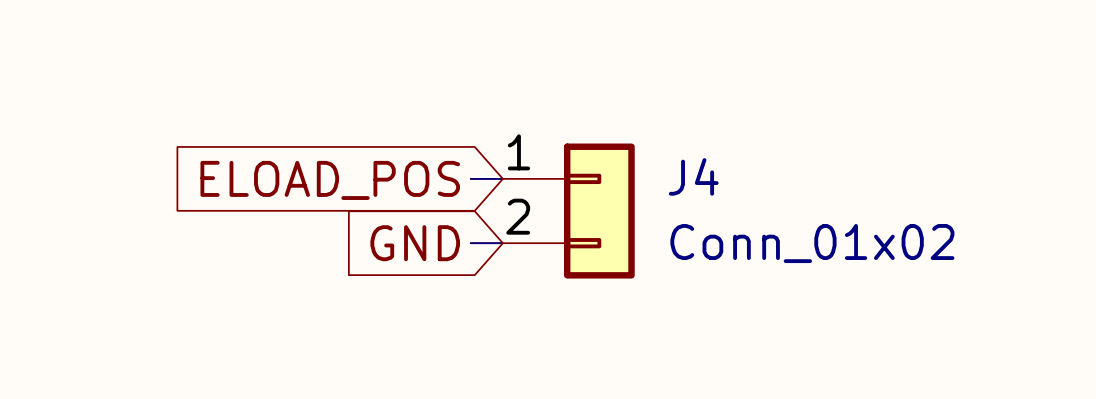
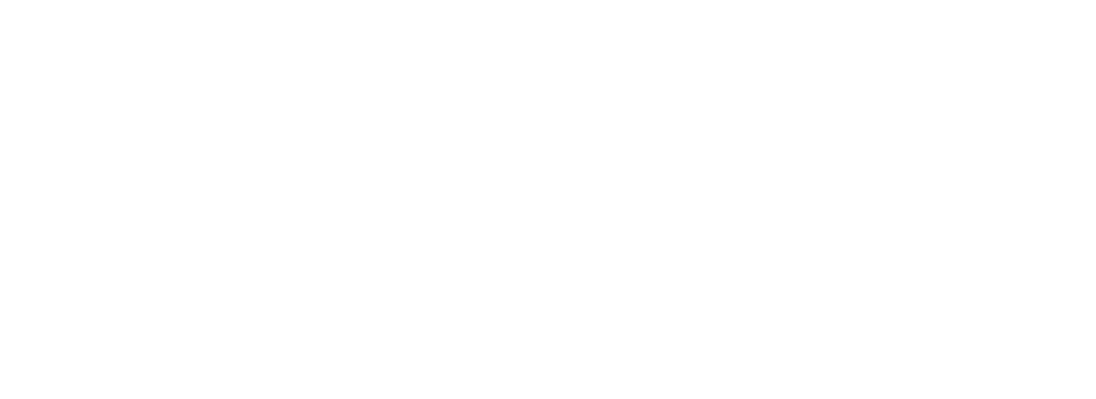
wire: (470, 178) (502, 178) -> none
global label: ELOAD_POS (330, 180) -> none
J4: Conn_01x02 (552, 211) -> none
global label: GND (415, 243) -> none
wire: (470, 243) (502, 243) -> none

